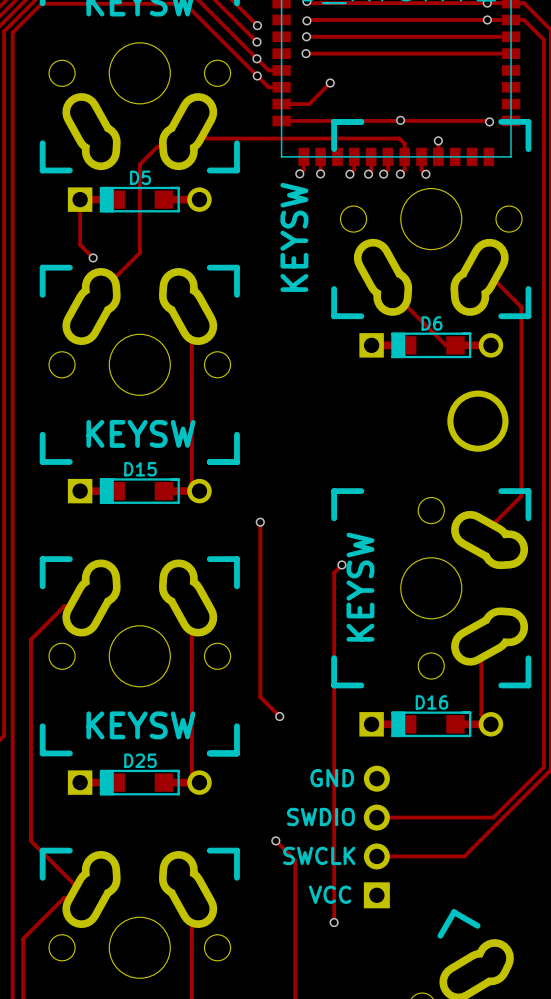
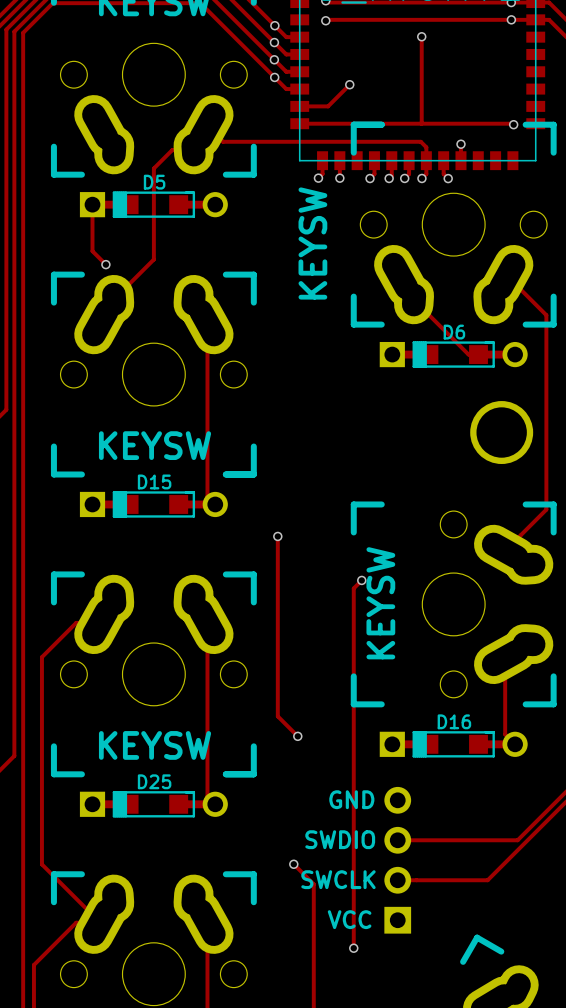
track: none -> (274, 25) (286, 37) (299, 37)
track: (306, 36) (511, 36) -> none
via: (306, 36) -> none
track: none -> (421, 36) (421, 123)
via: none -> (421, 36)
track: none -> (274, 42) (286, 54) (299, 54)
track: (306, 53) (511, 53) -> none
via: (306, 53) -> none
via: (400, 120) -> none

